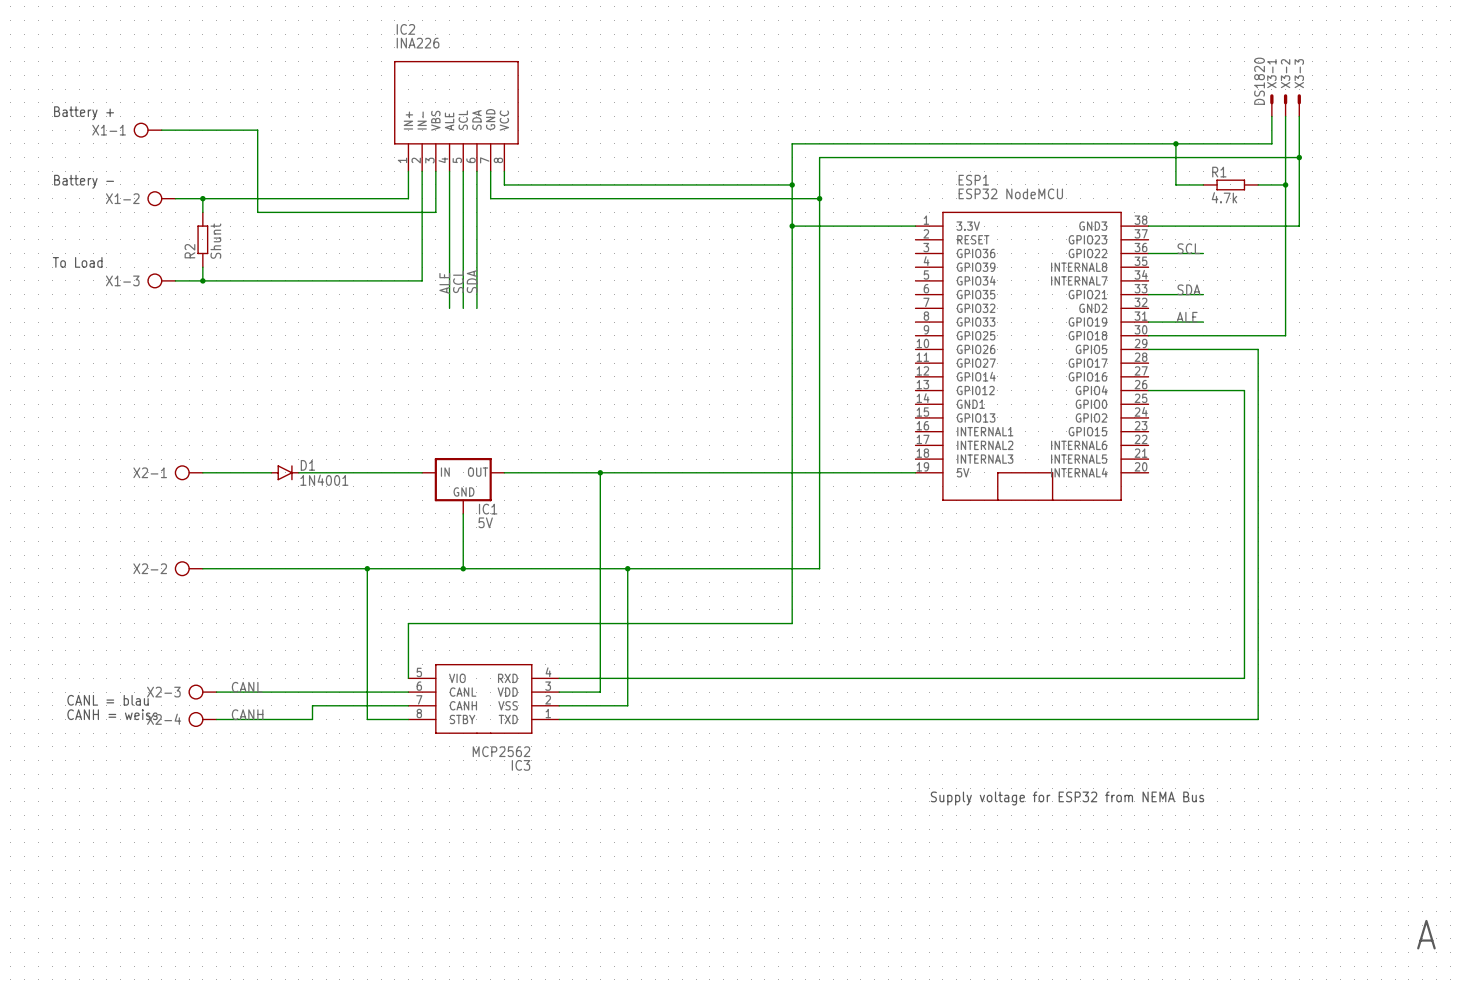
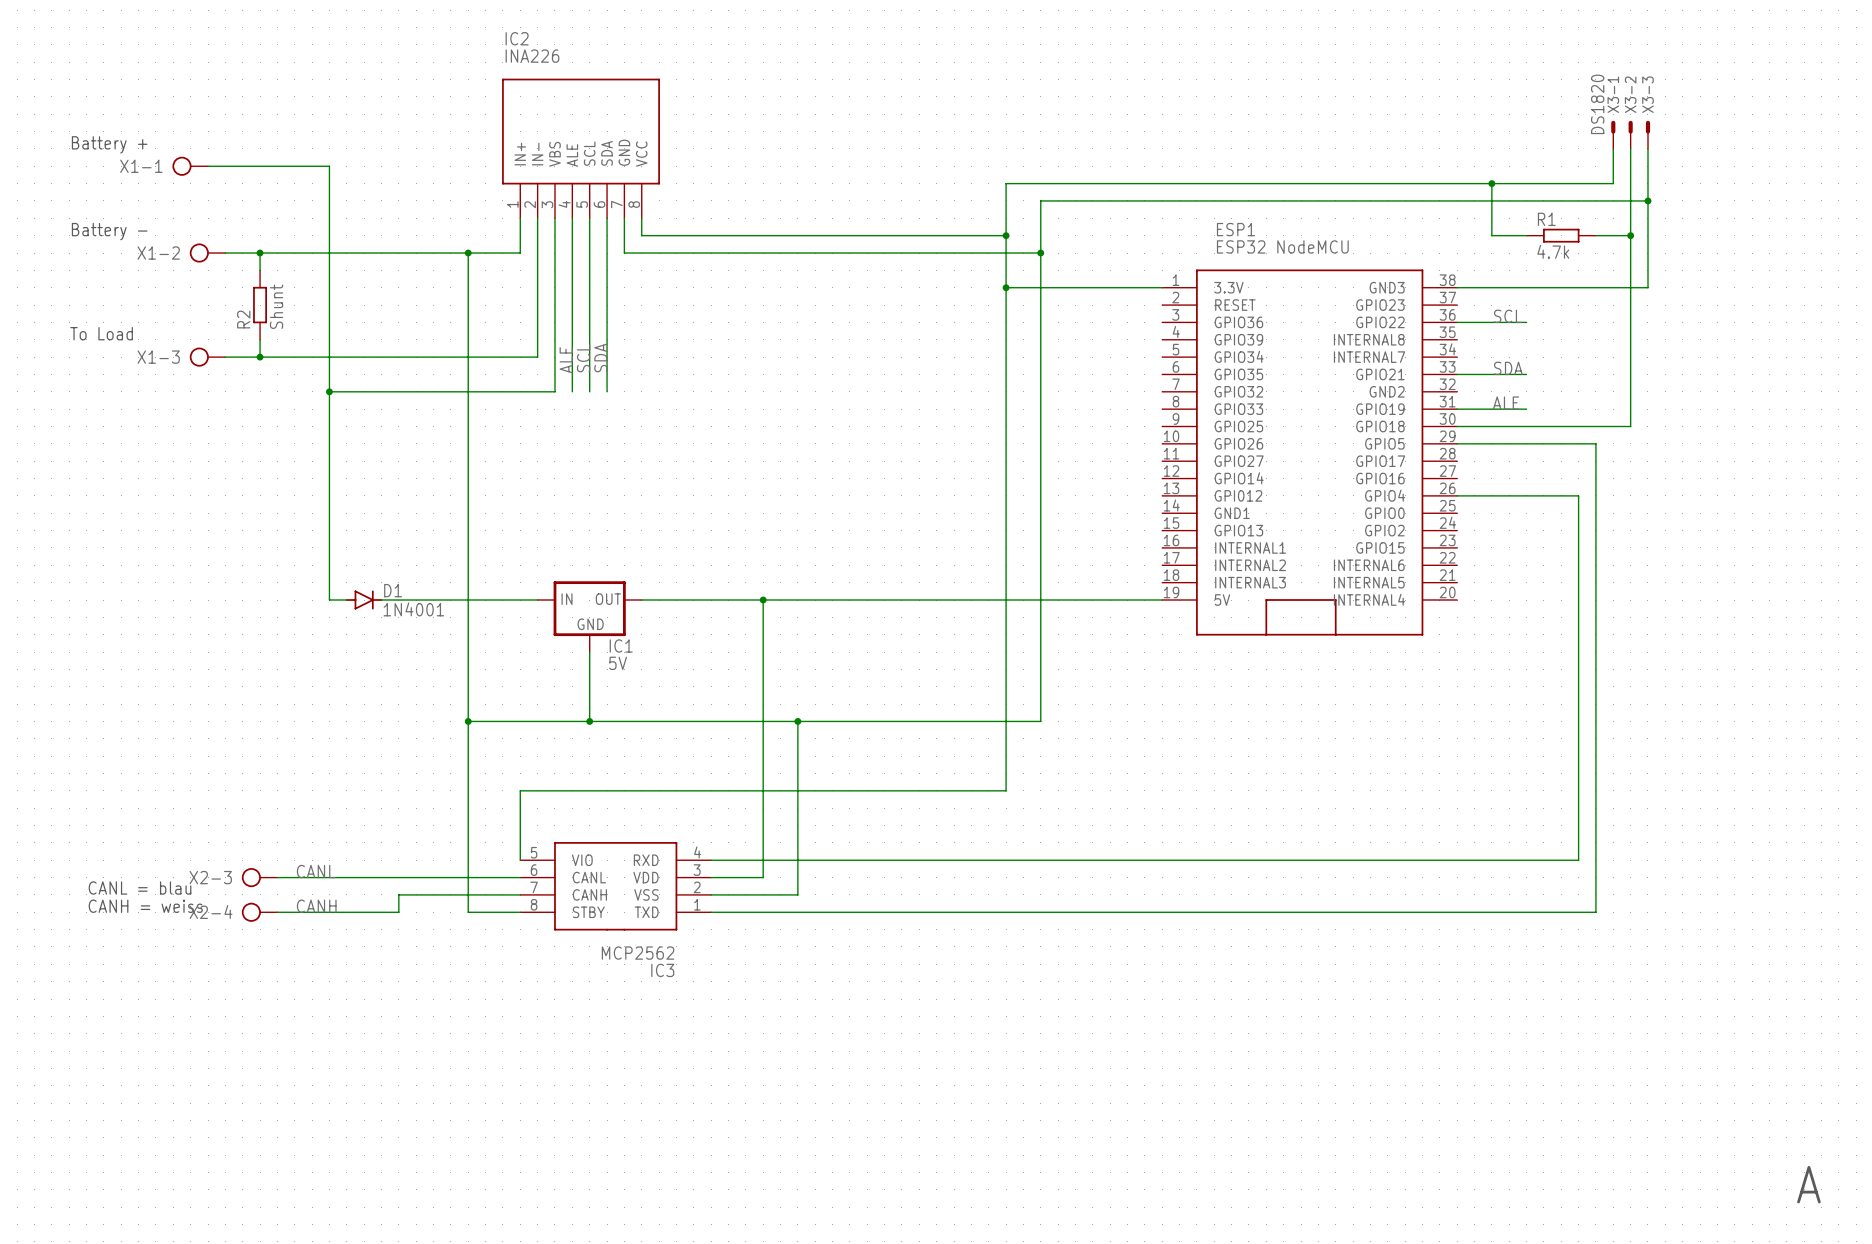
junction: none -> (468, 253)
wire: (257, 212) (435, 212) -> (329, 391) (554, 391) (554, 270)
junction: none -> (329, 391)
X2-1: (188, 472) -> none
wire: (202, 472) (257, 472) -> (329, 270) (329, 600)
X2-2: (188, 568) -> none
wire: (202, 568) (367, 568) -> (468, 253) (468, 721)
text: Supply voltage for ESP32 from NEMA Bus (1067, 798) -> none

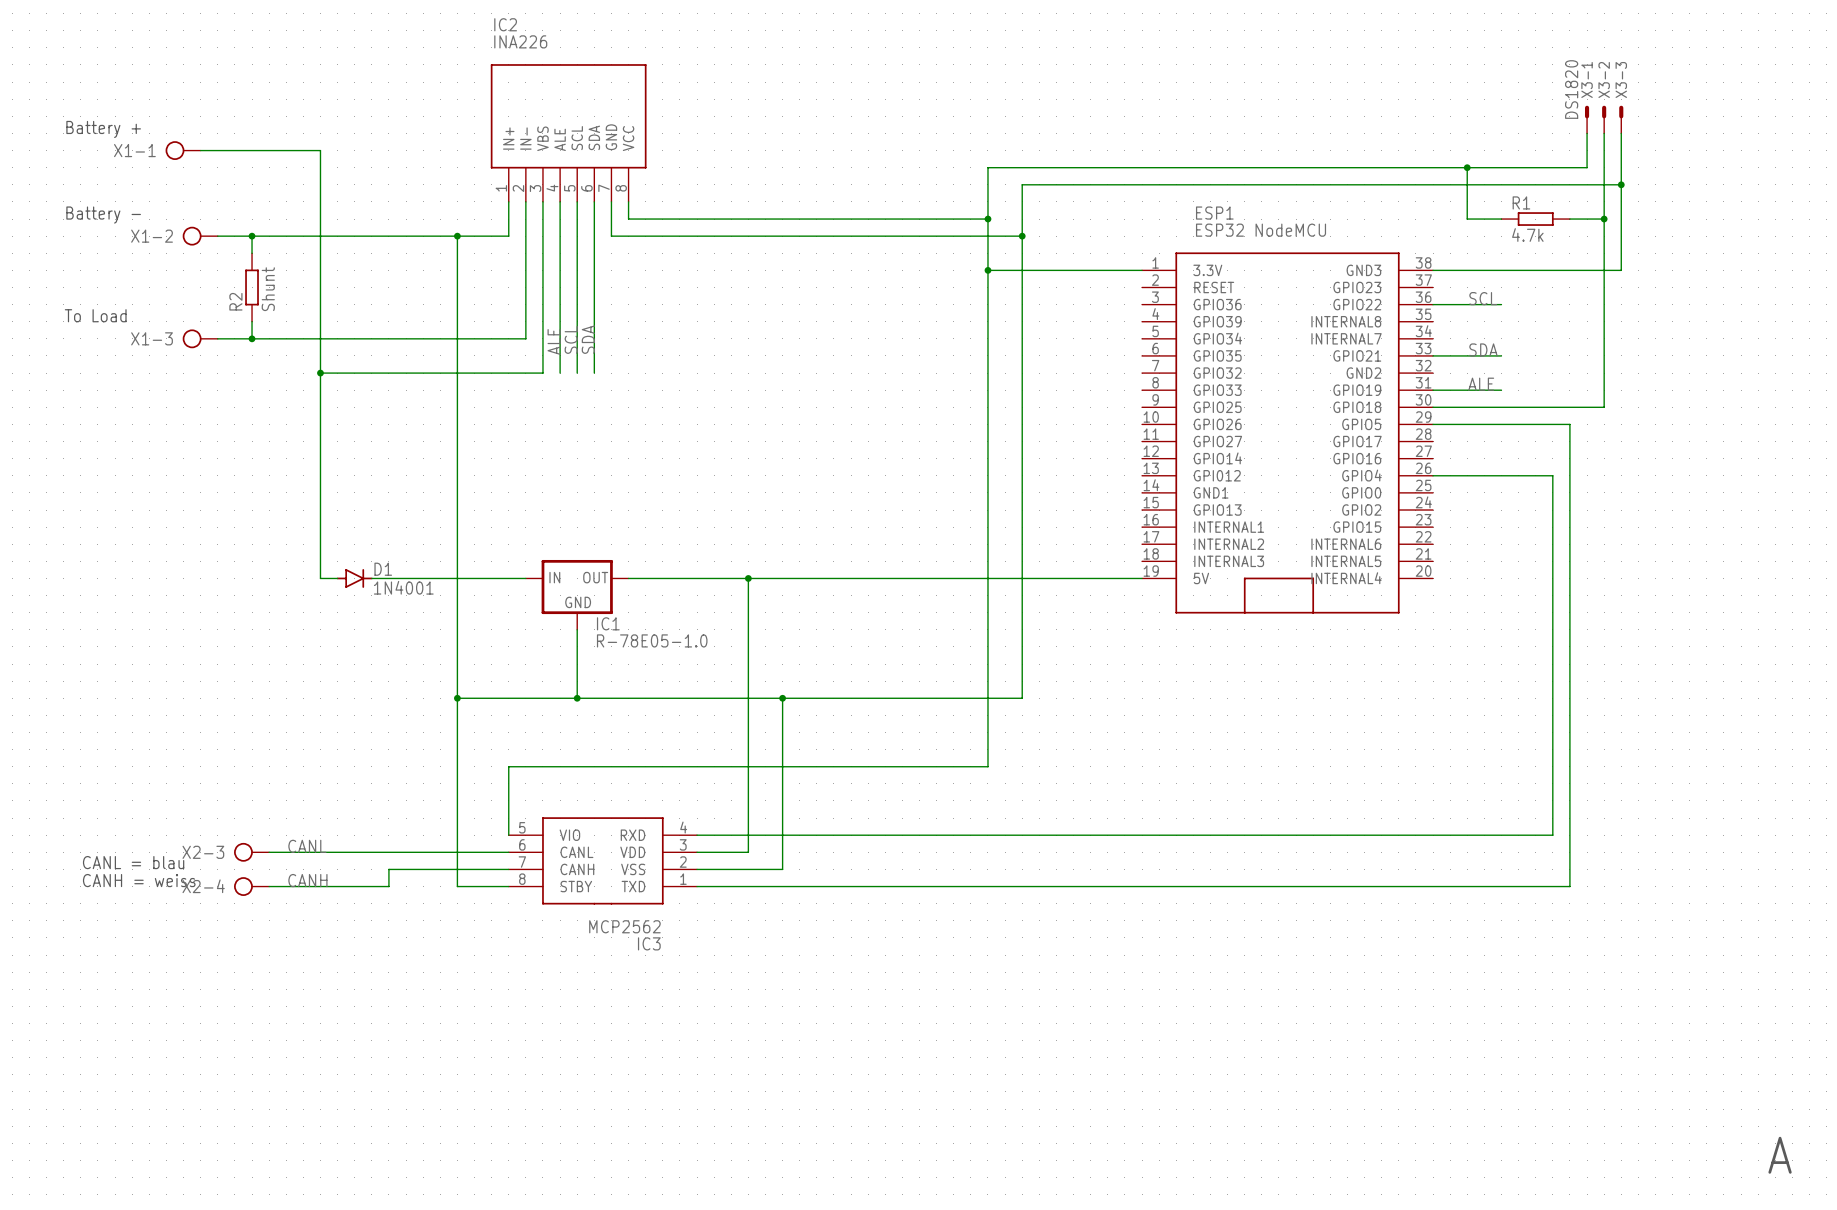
IC1 value: 5V (618, 663) -> R-78E05-1.0 (652, 640)

